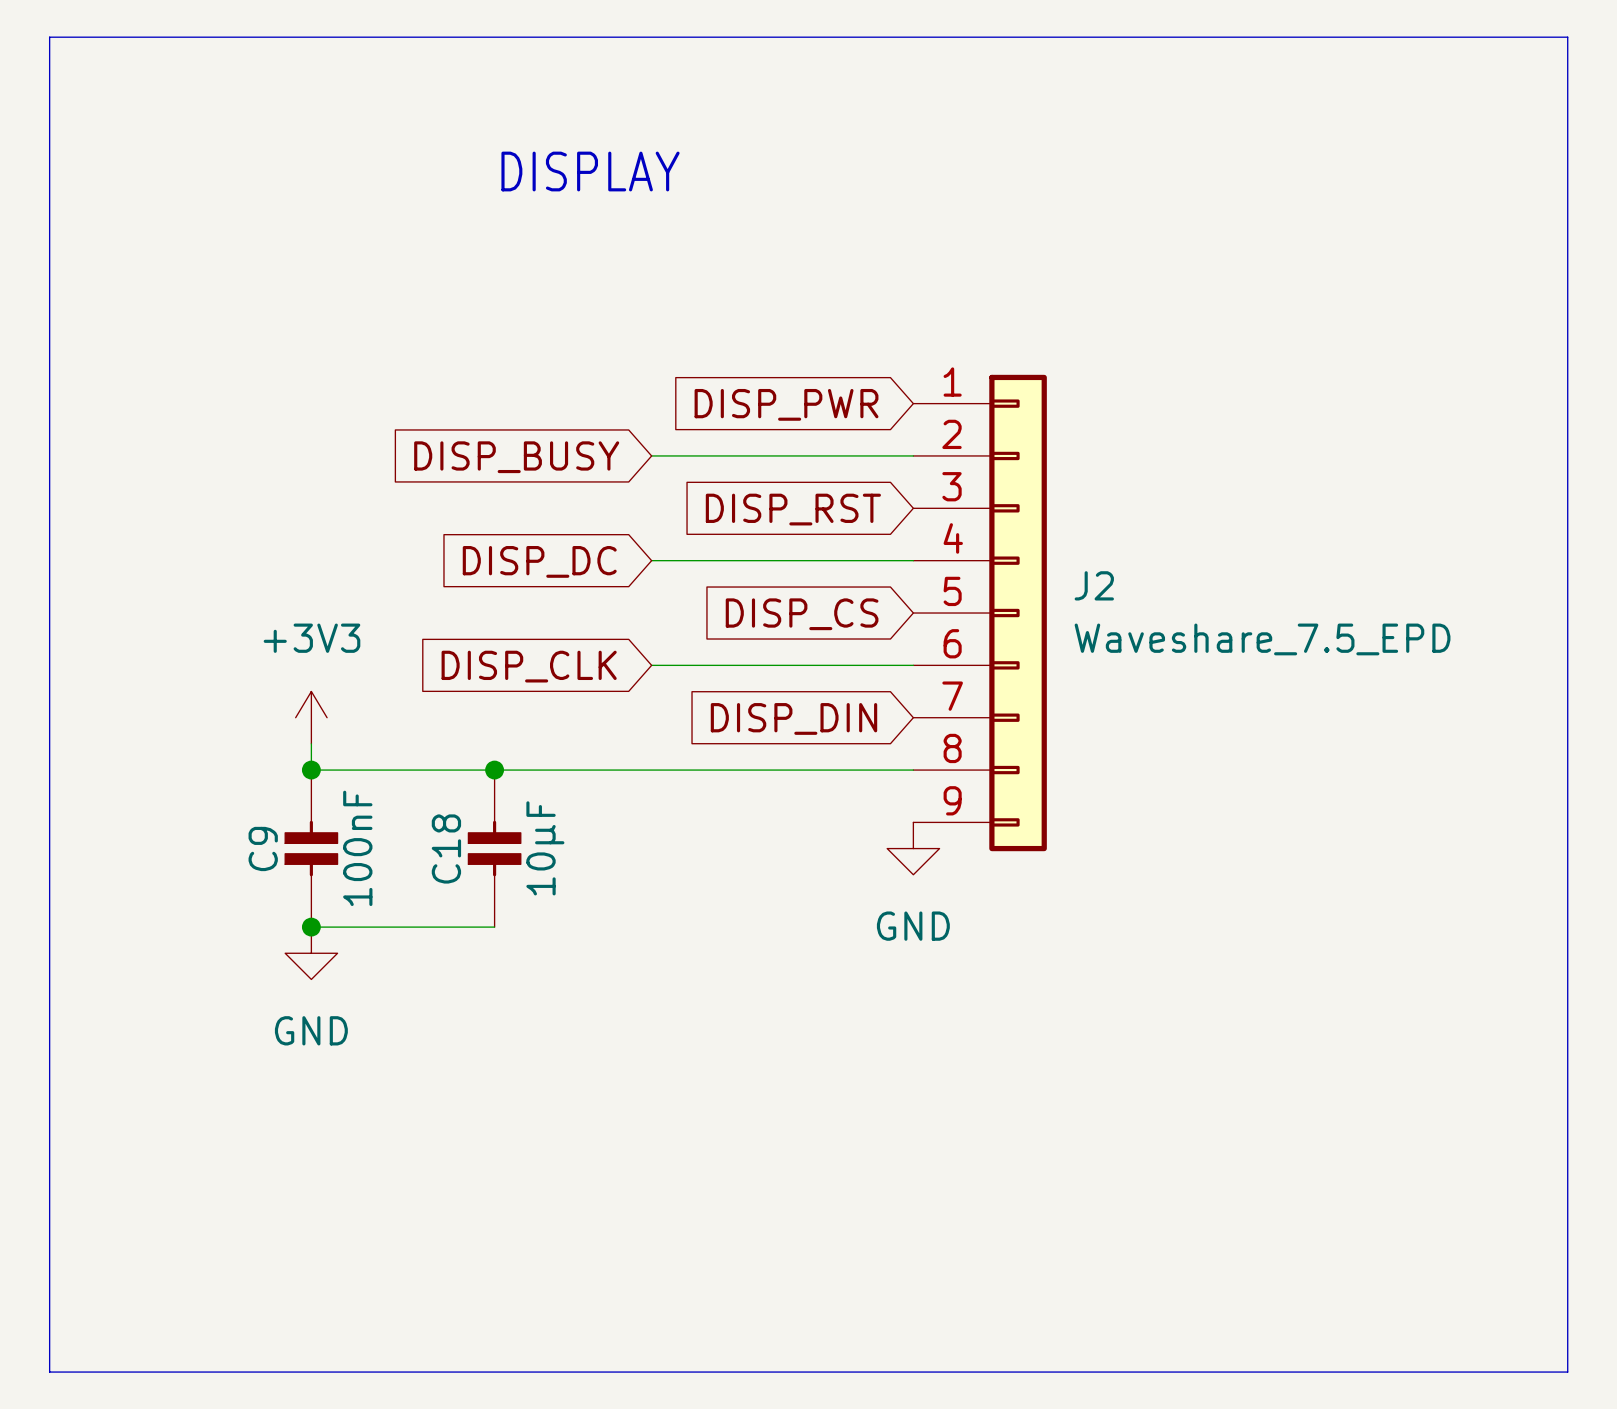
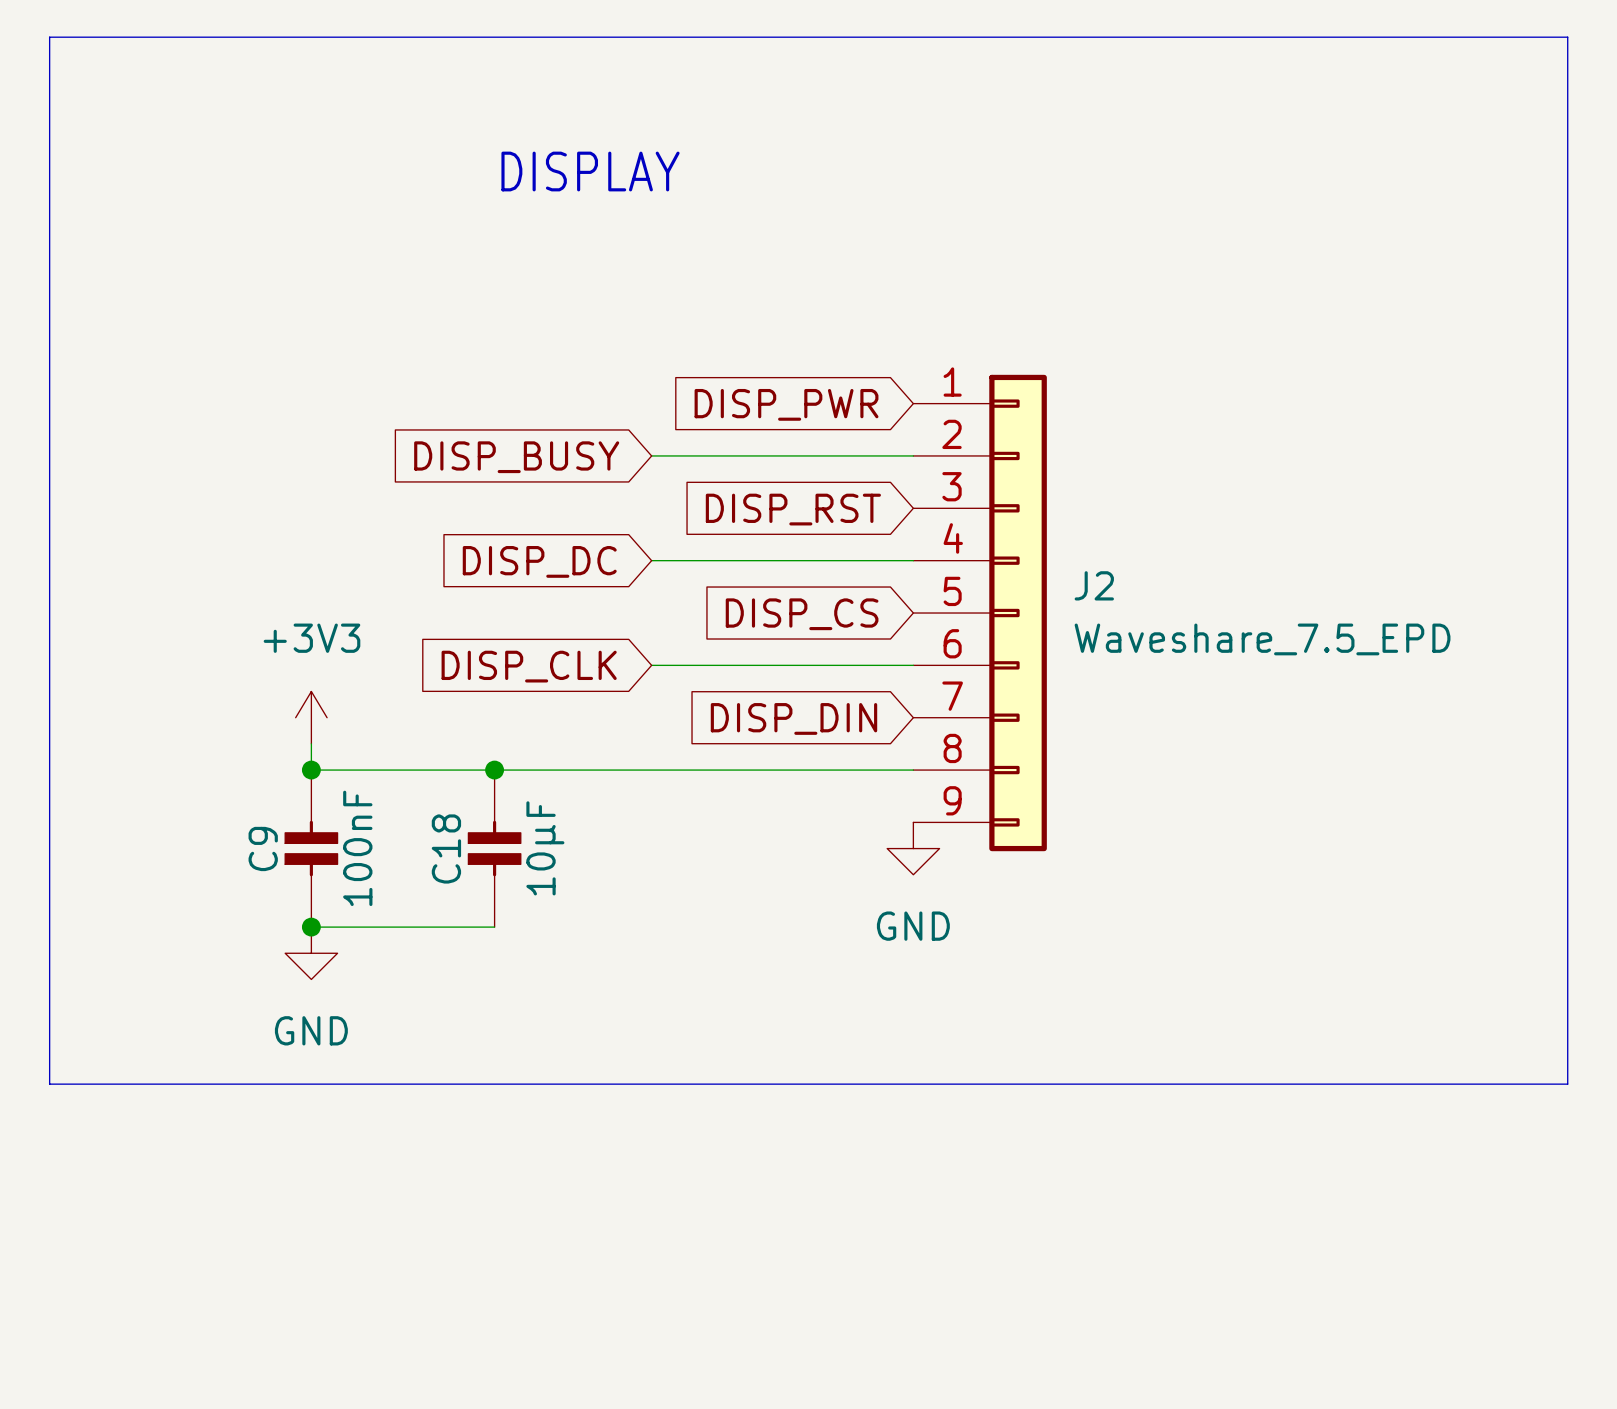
line: (49, 1084) (49, 1372) (1567, 1372) (1567, 1084) -> (49, 1084) (1567, 1084)

